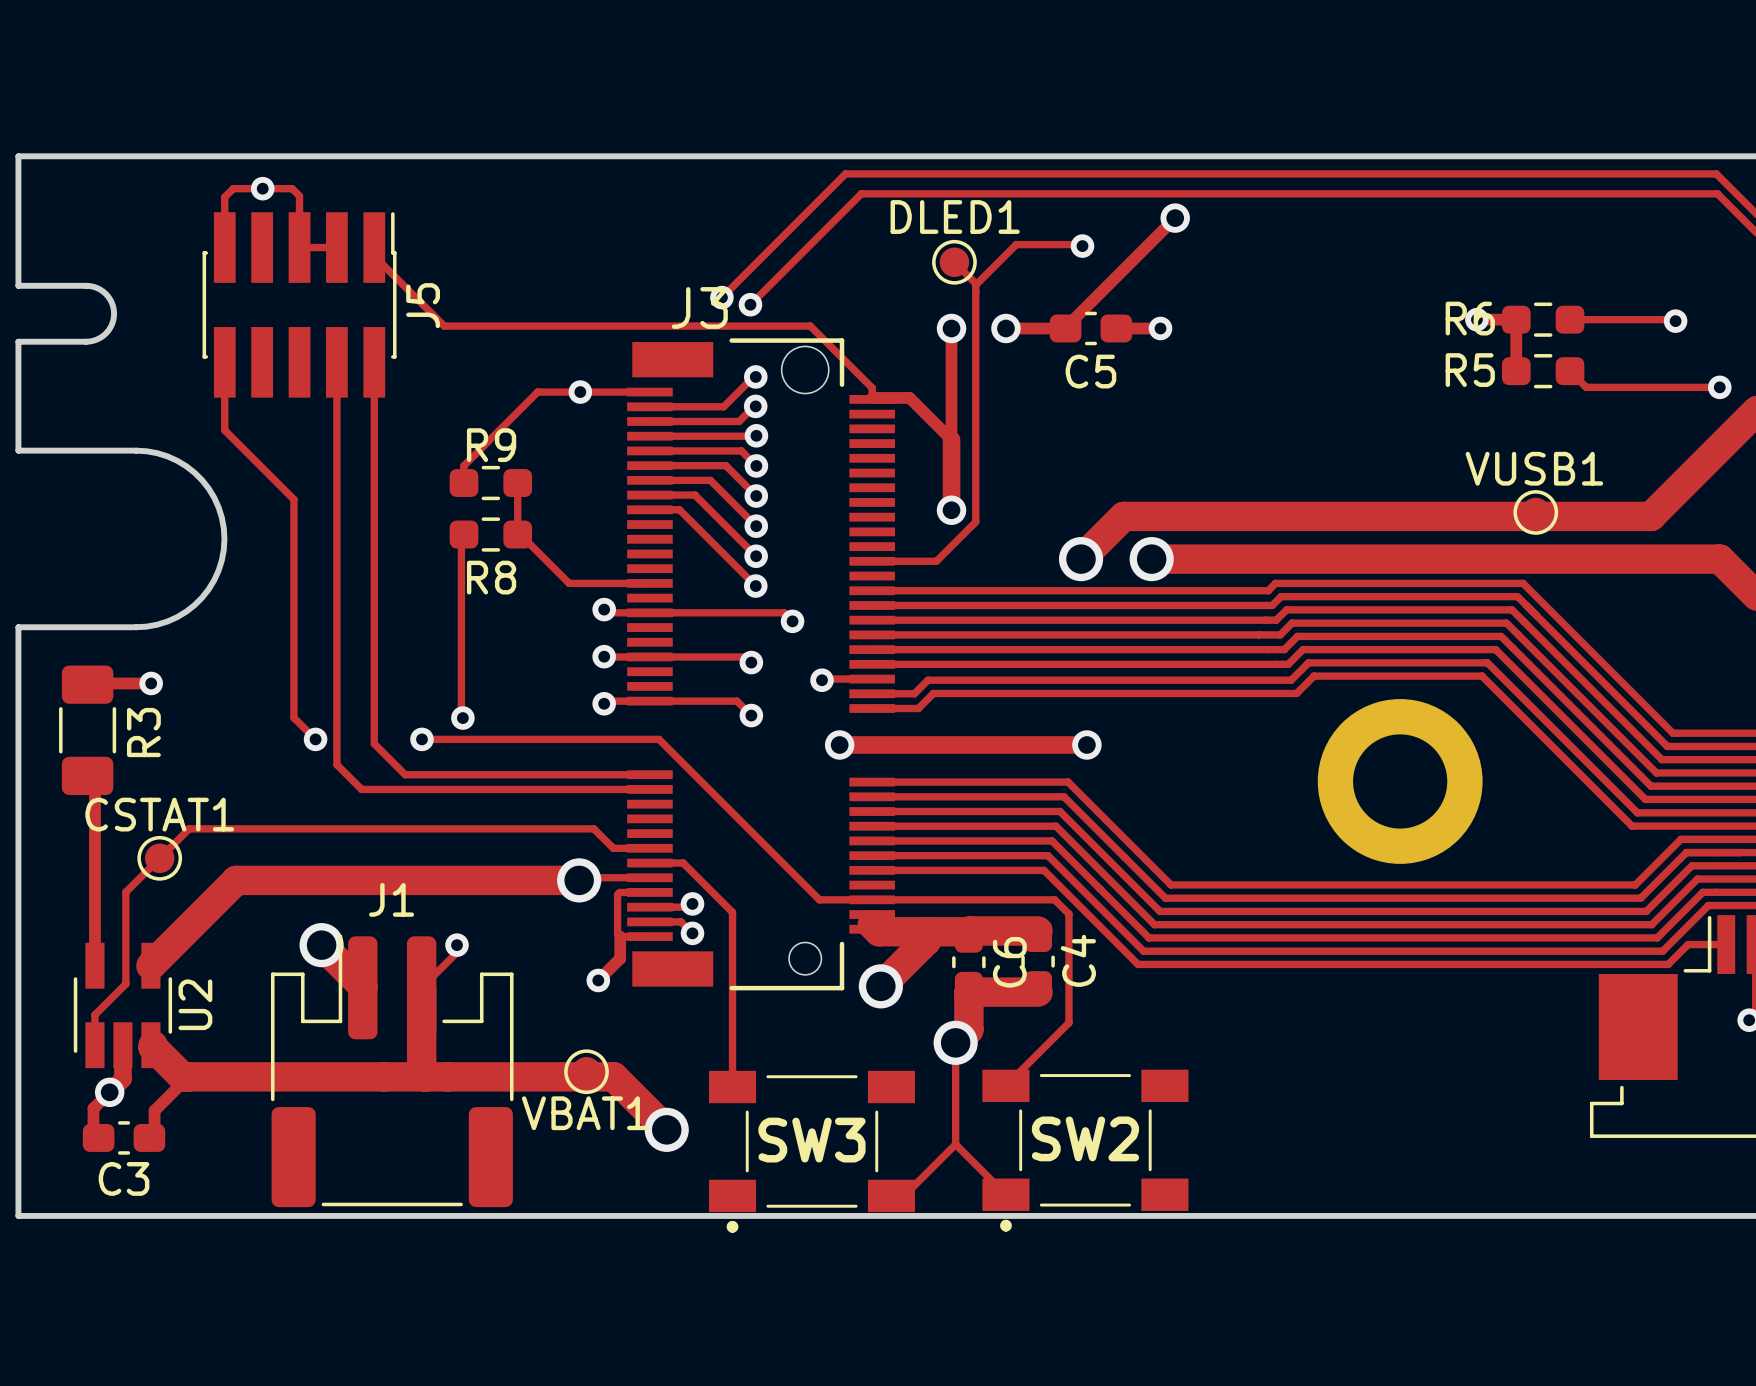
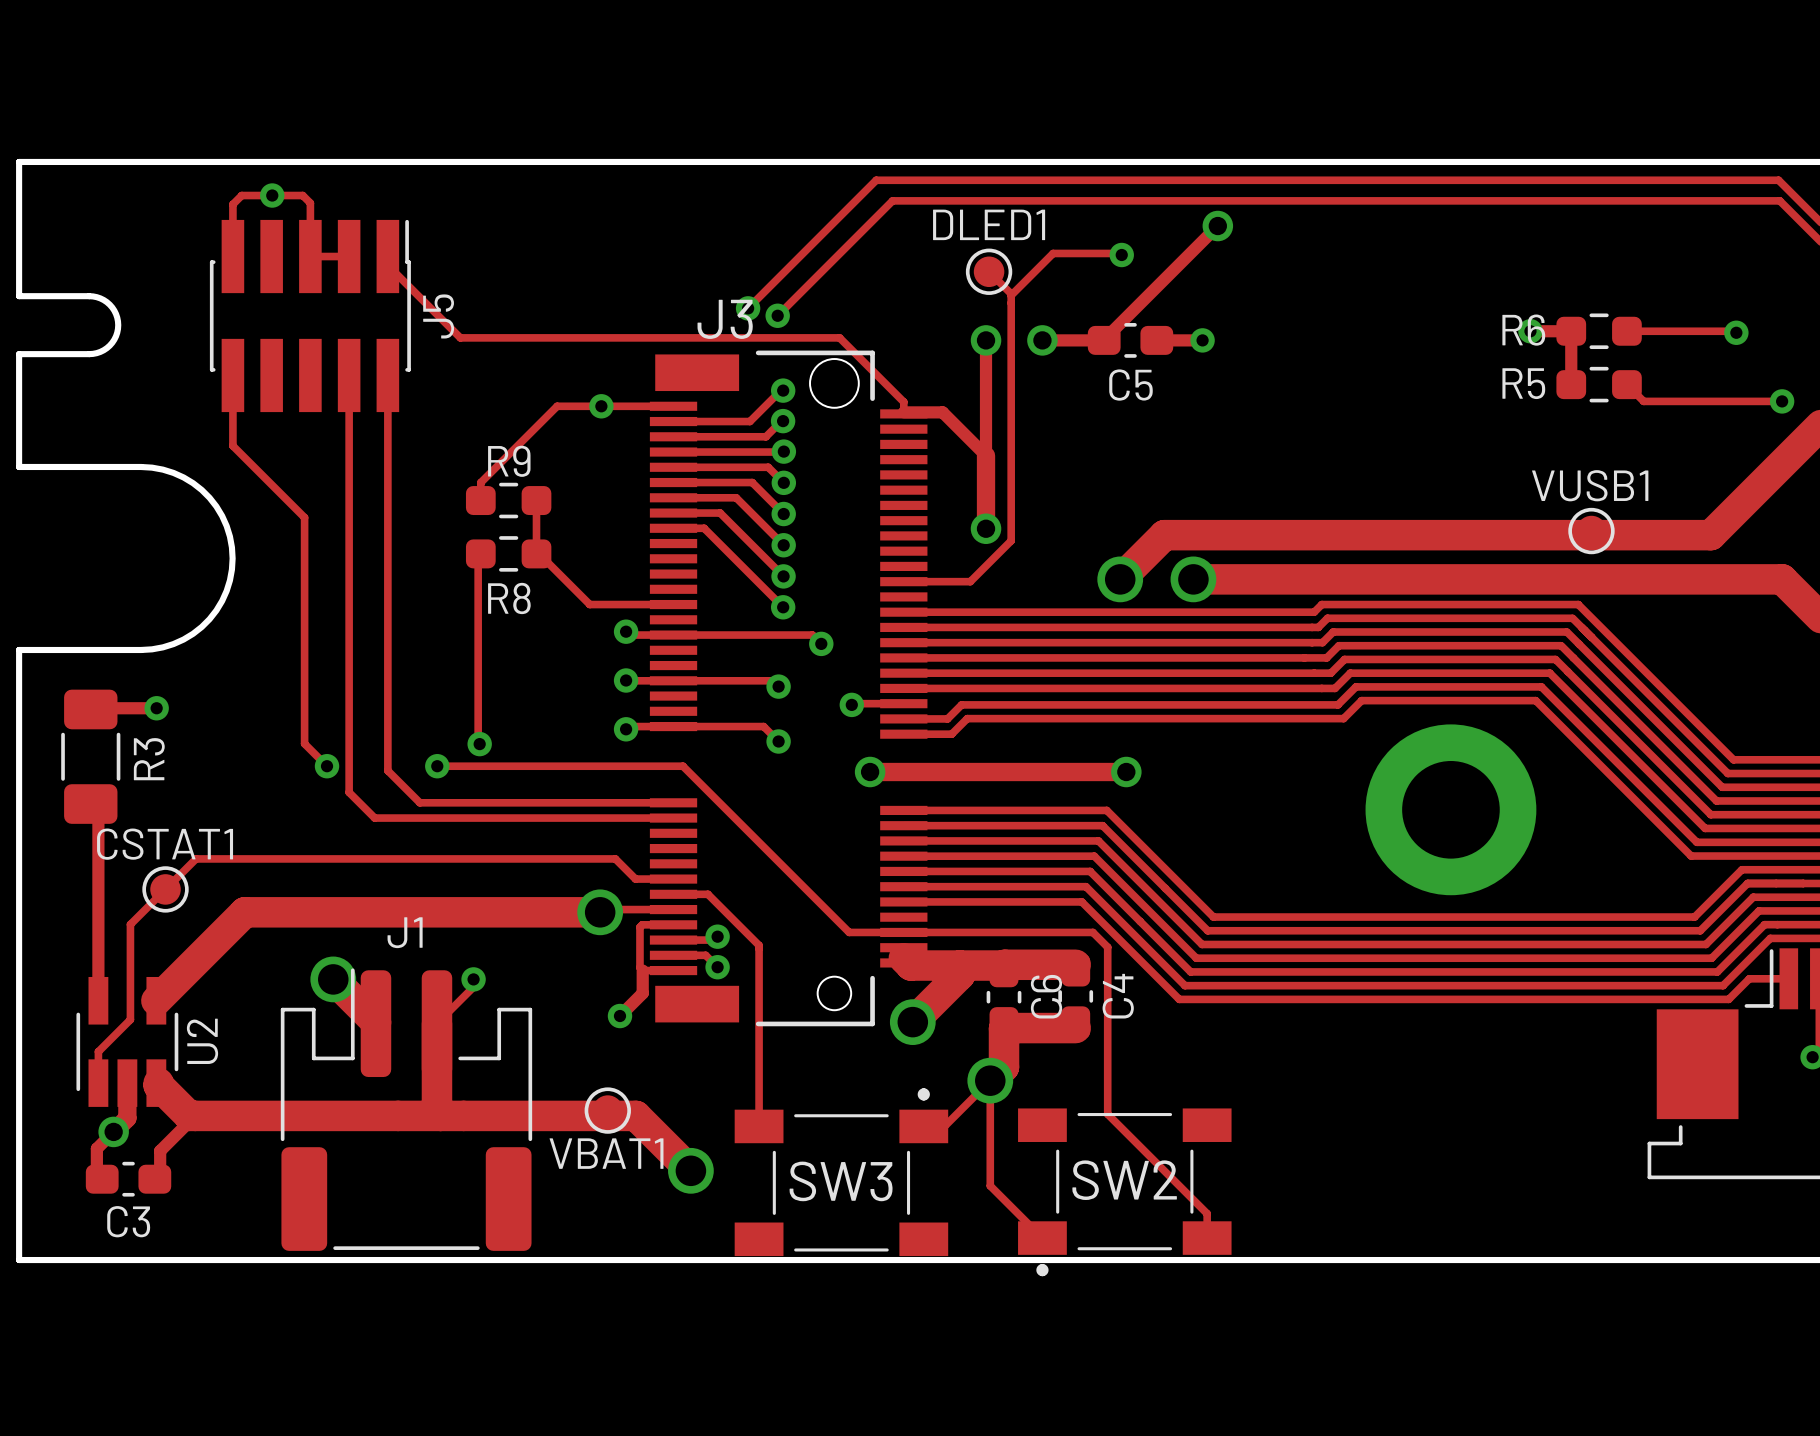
track: (1068, 1022) (1005, 1085) -> (1107, 1059) (1107, 1114) (1207, 1213) (1207, 1238)
track: none -> (990, 1080) (944, 1126) (923, 1126)
track: (955, 1144) (904, 1195) (891, 1195) -> none
SW3 rotation: 0° (811, 1151) -> 180° (841, 1172)

